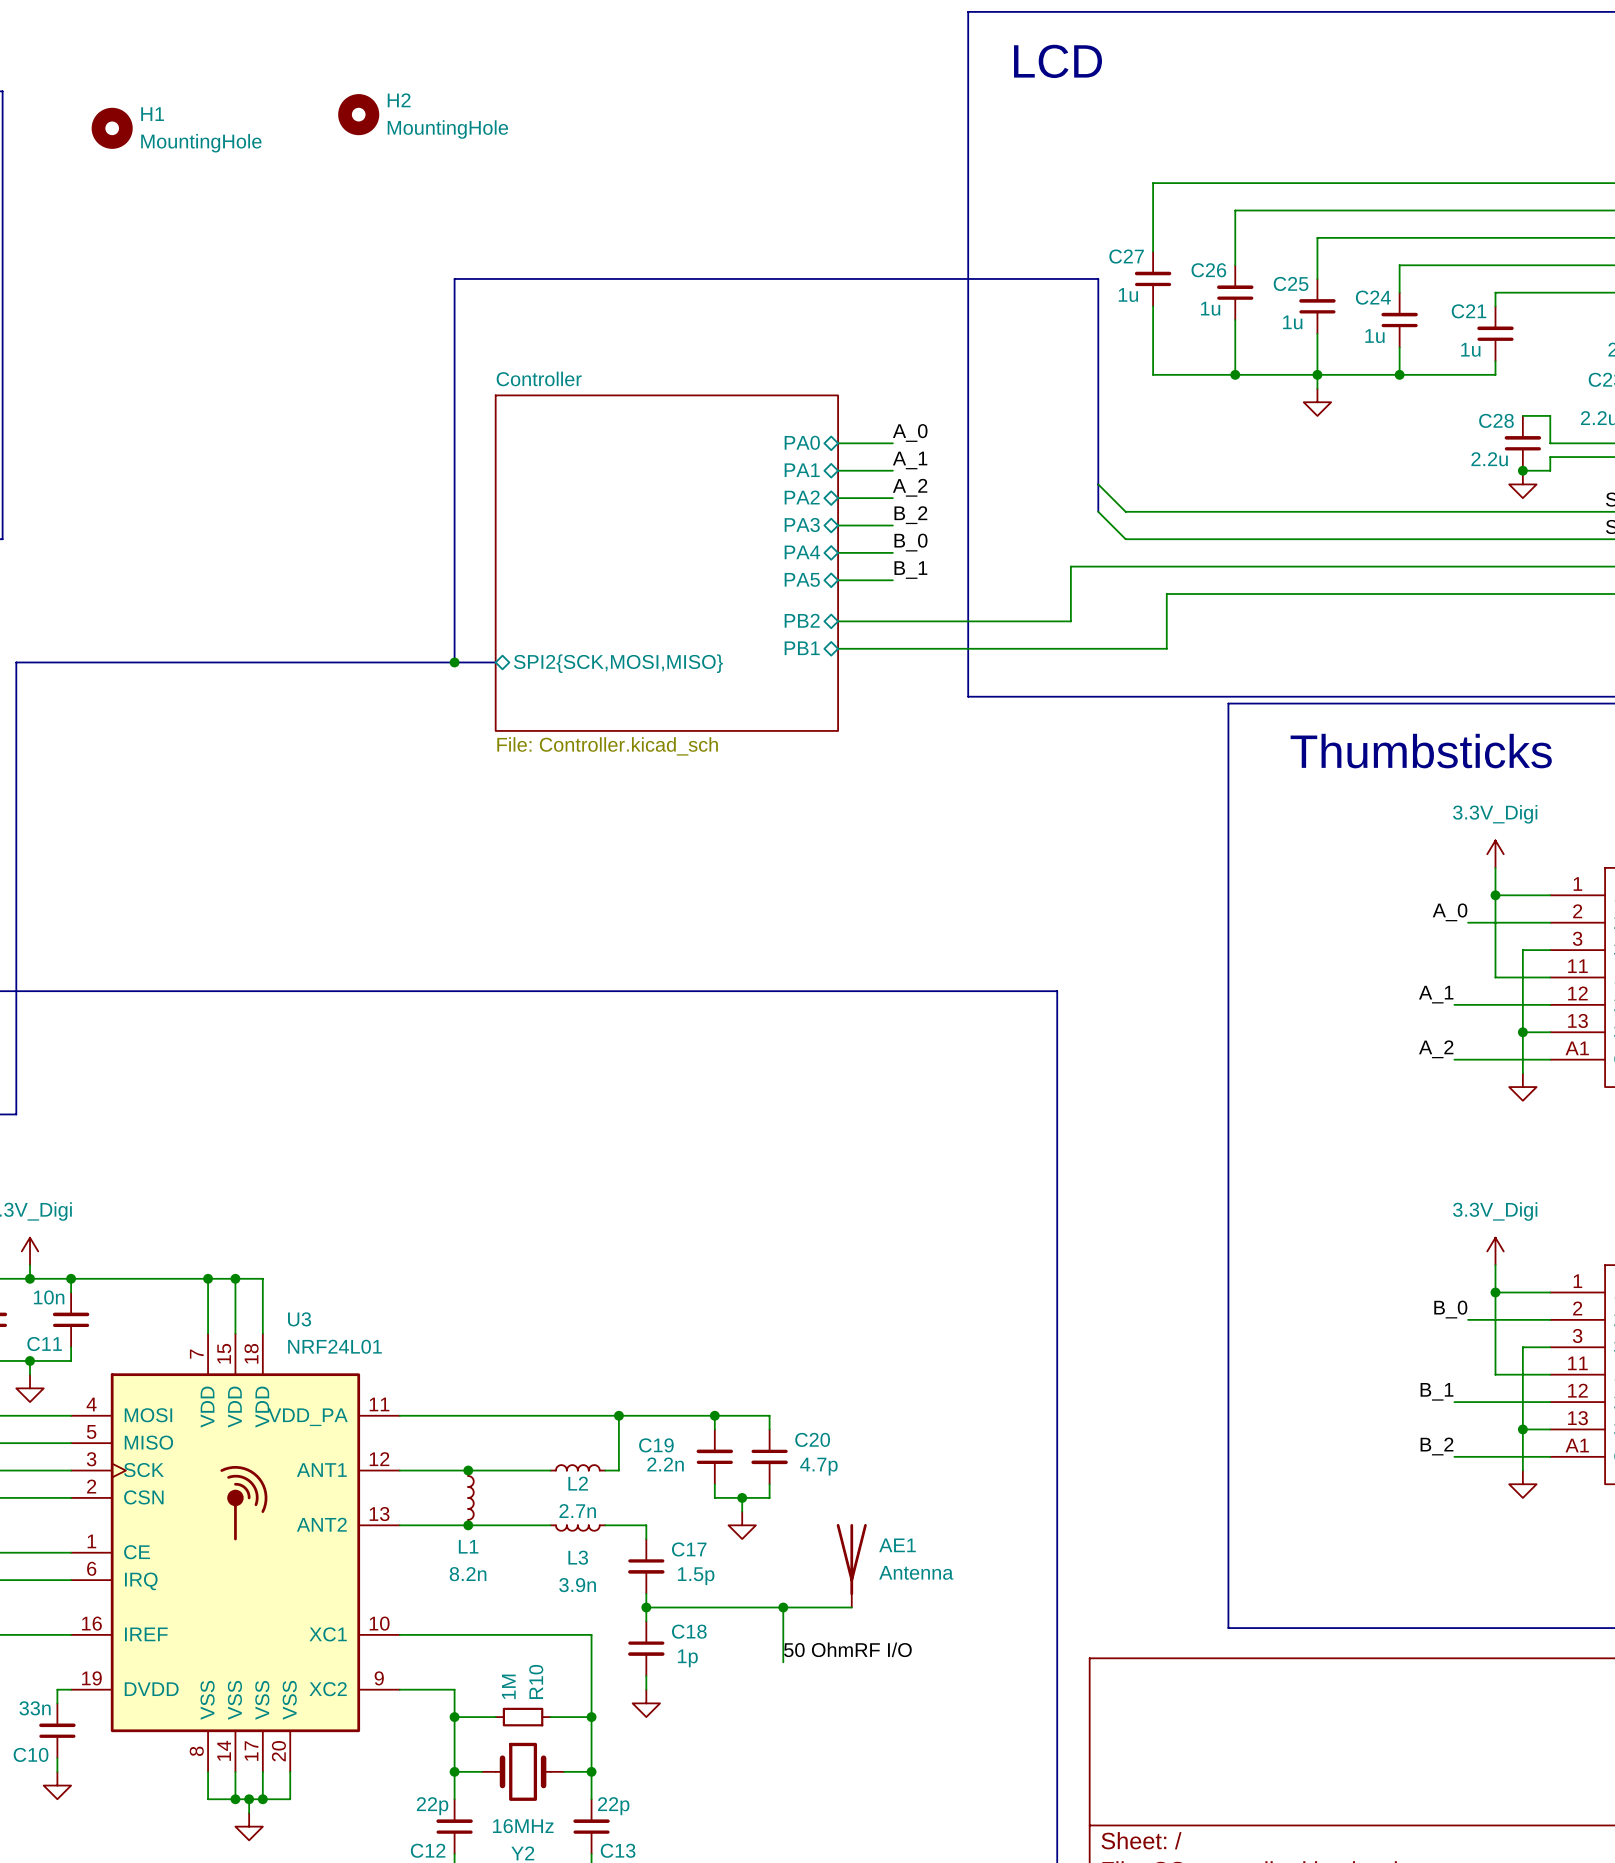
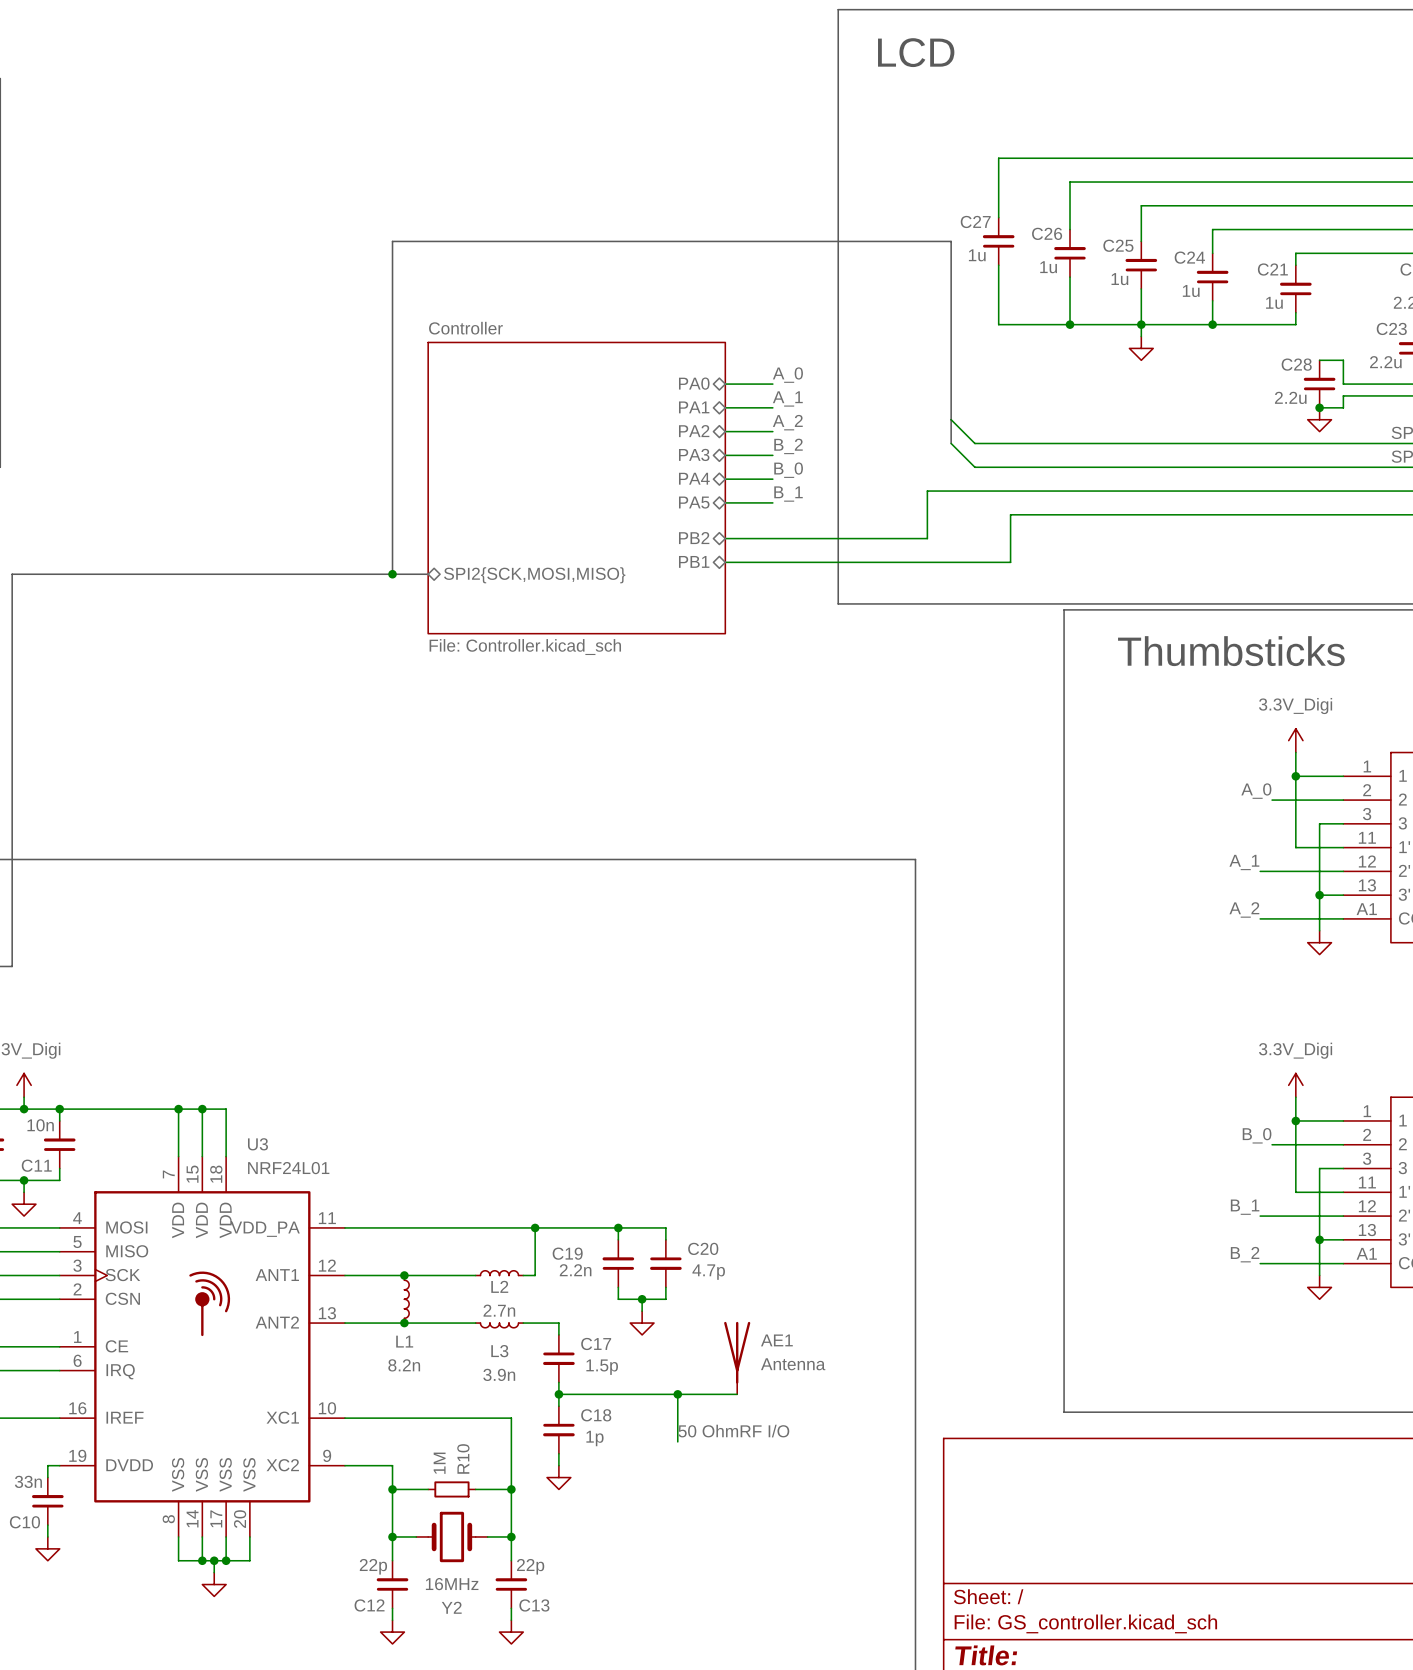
H2: MountingHole (358, 114) -> none
H1: MountingHole (112, 128) -> none

